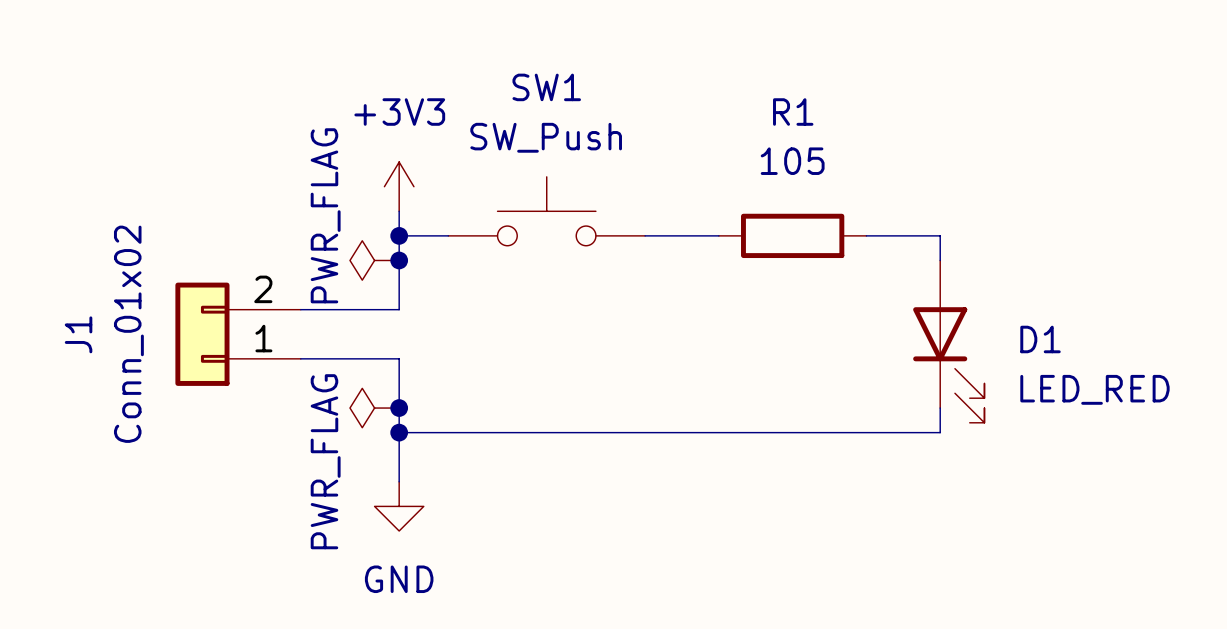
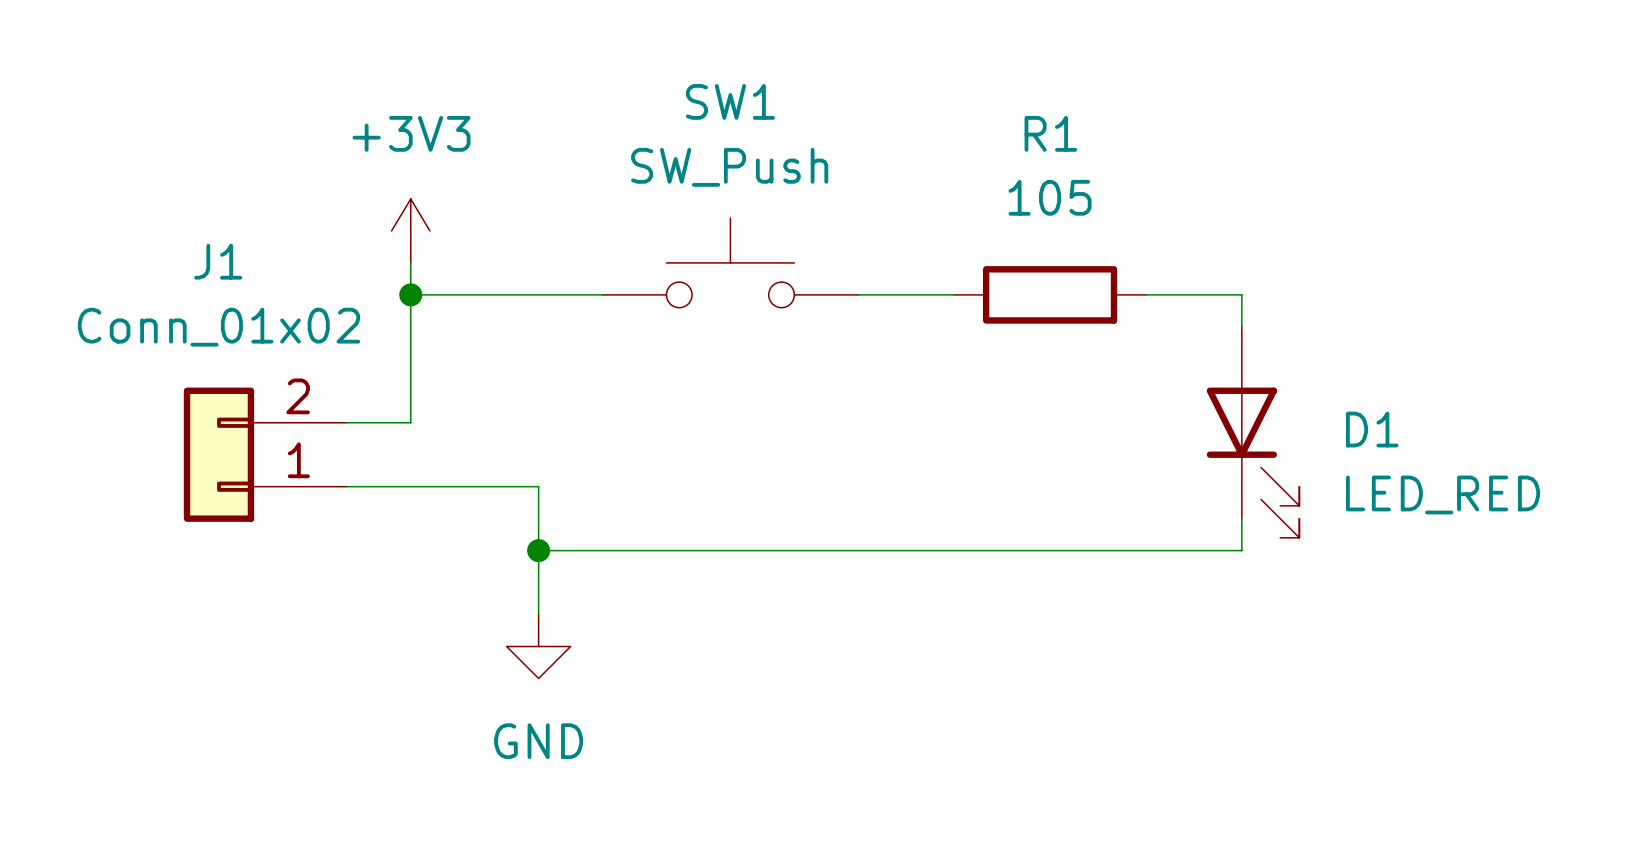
power symbol position: +3V3 (399, 186) -> +3V3 (410, 230)
wire: none -> (410, 262) (410, 422) (346, 422)
wire: (399, 211) (399, 309) (300, 309) -> none
wire: none -> (410, 294) (538, 294)
junction: none -> (410, 294)
junction: (399, 235) -> none
power symbol: PWR_FLAG (374, 260) -> none
junction: (399, 260) -> none
J1 name rotation: 0° (78, 334) -> 90° clockwise (218, 261)
J1 name position: J1 (78, 334) -> J1 (218, 261)
J1 value rotation: 0° (128, 334) -> 90° clockwise (218, 327)
J1 position: (238, 334) -> (265, 454)
wire: (300, 358) (399, 358) (399, 383) -> (346, 486) (538, 486)
power symbol: PWR_FLAG (374, 408) -> none
junction: (399, 408) -> none

